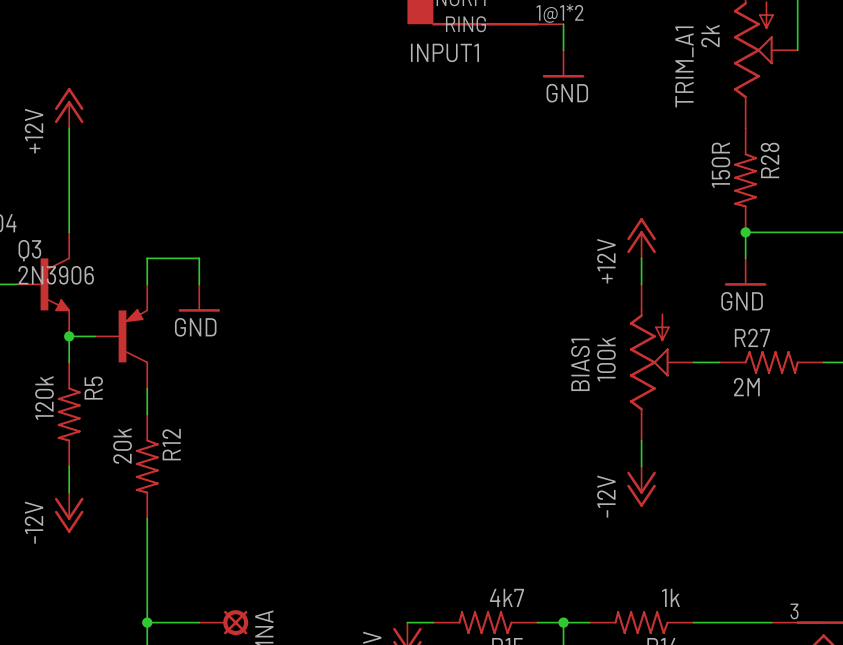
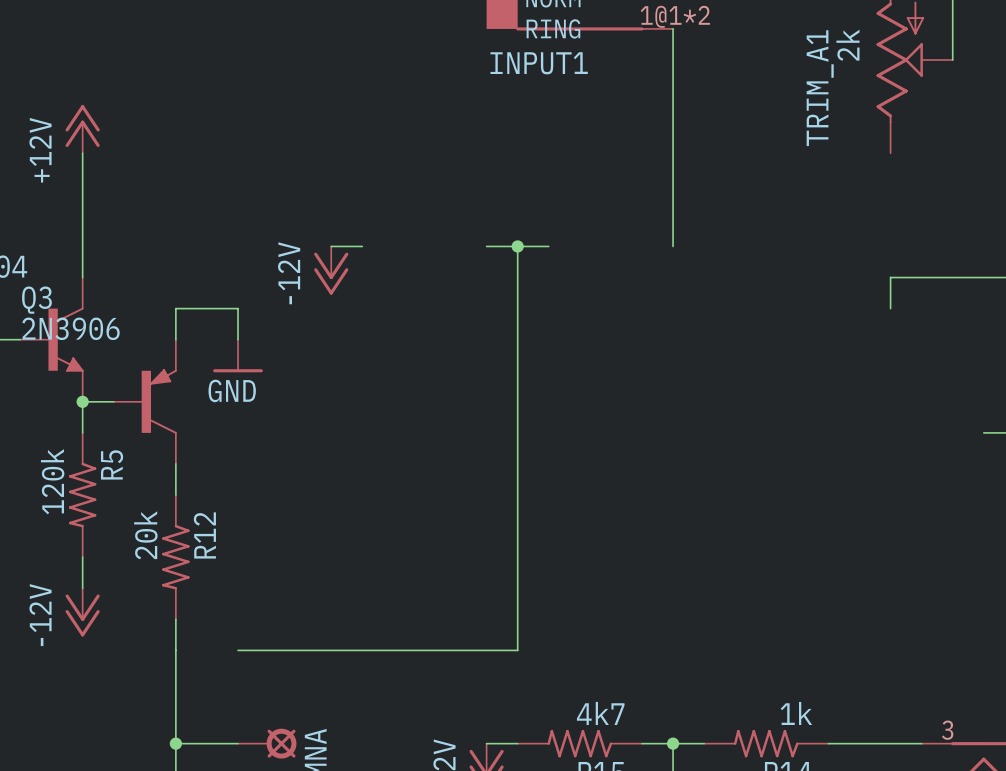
wire: none -> (673, 60) (673, 246)
power symbol: GND (563, 63) -> none
R28: 150R (745, 180) -> none
wire: none -> (331, 246) (362, 246)
wire: none -> (486, 246) (548, 246)
wire: none -> (517, 246) (517, 650) (238, 650)
junction: none -> (517, 246)
power symbol: none -> -12V (331, 270)
junction: (745, 232) -> none
power symbol: +12V (641, 238) -> none
wire: (641, 258) (641, 284) -> none
power symbol: GND (745, 272) -> none
BIAS1: 100k (661, 362) -> none
wire: (693, 362) (719, 362) -> none
R27: 2M (771, 362) -> none
wire: (641, 440) (641, 466) -> none
power symbol: -12V (641, 486) -> none

